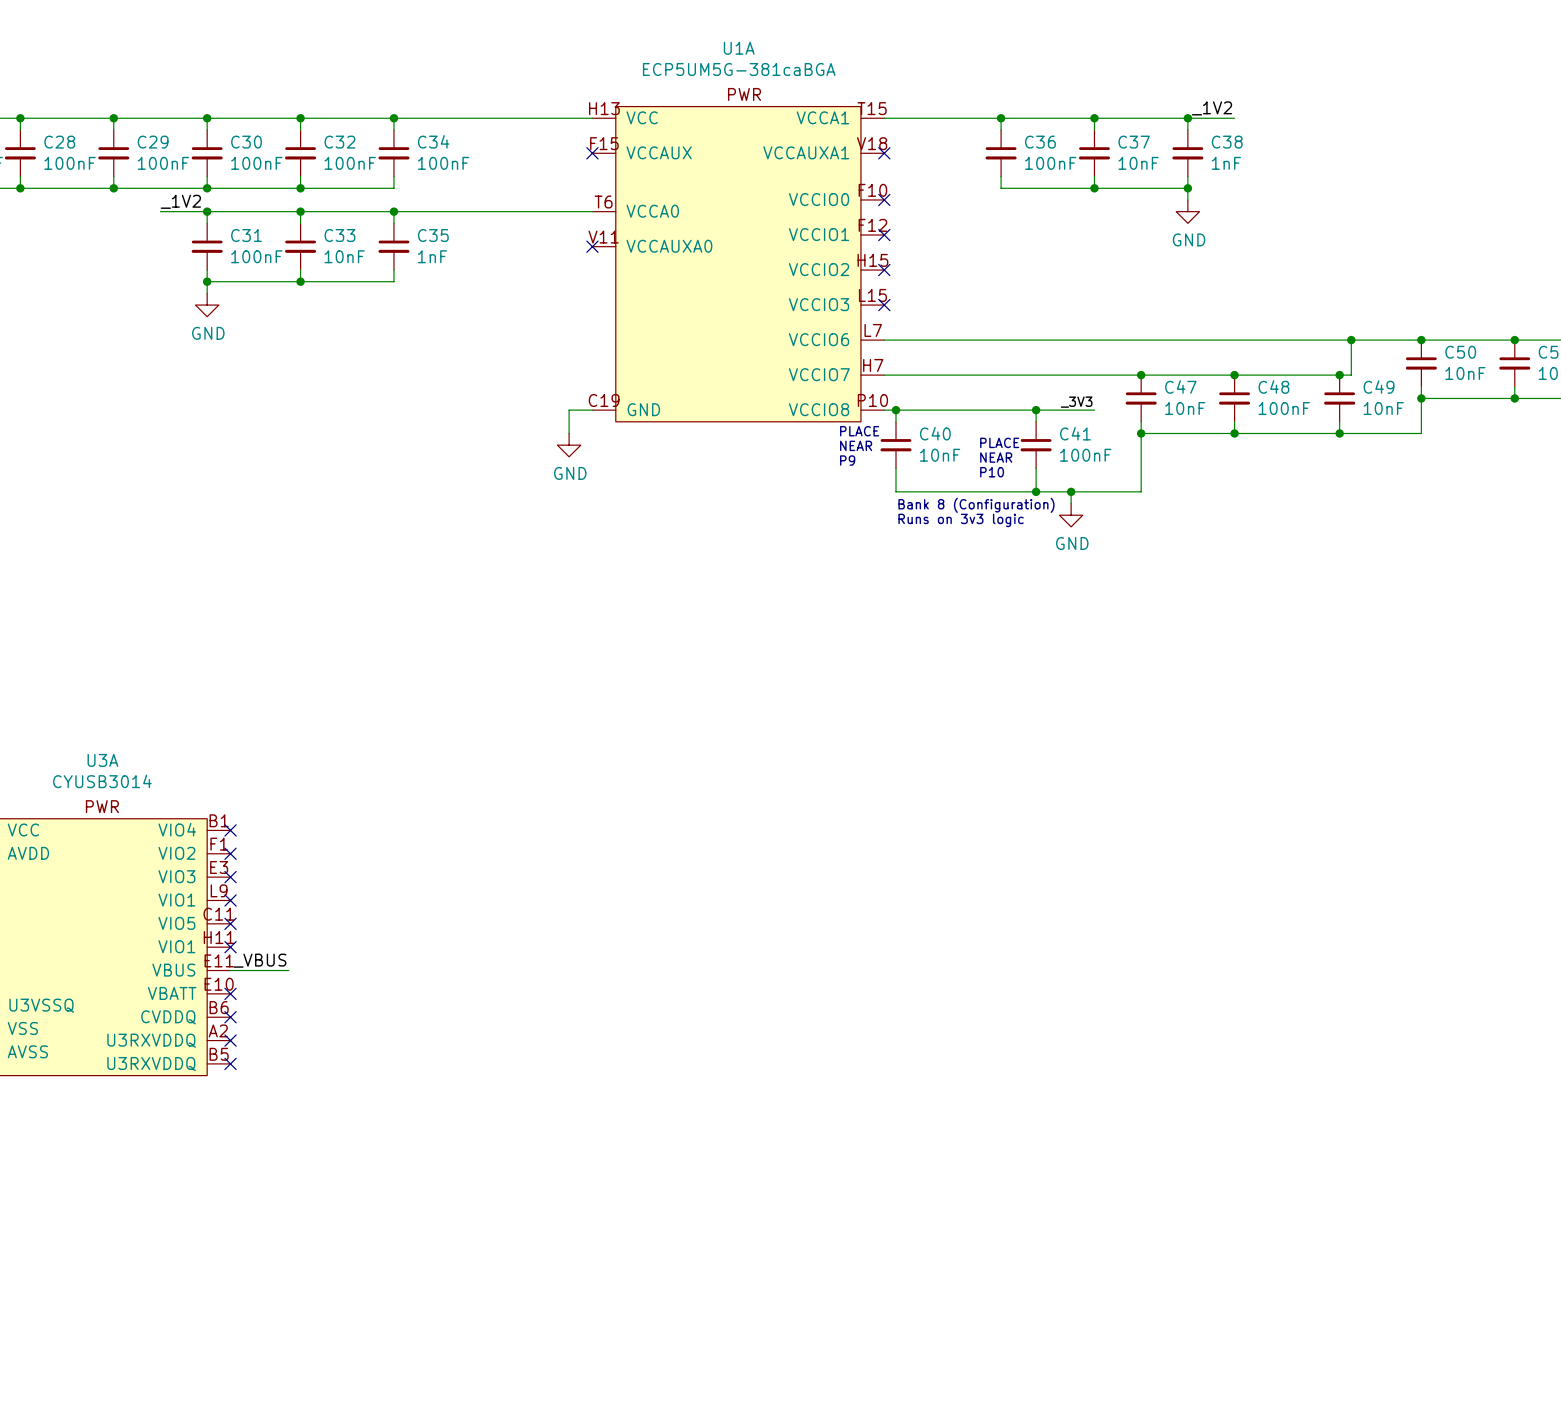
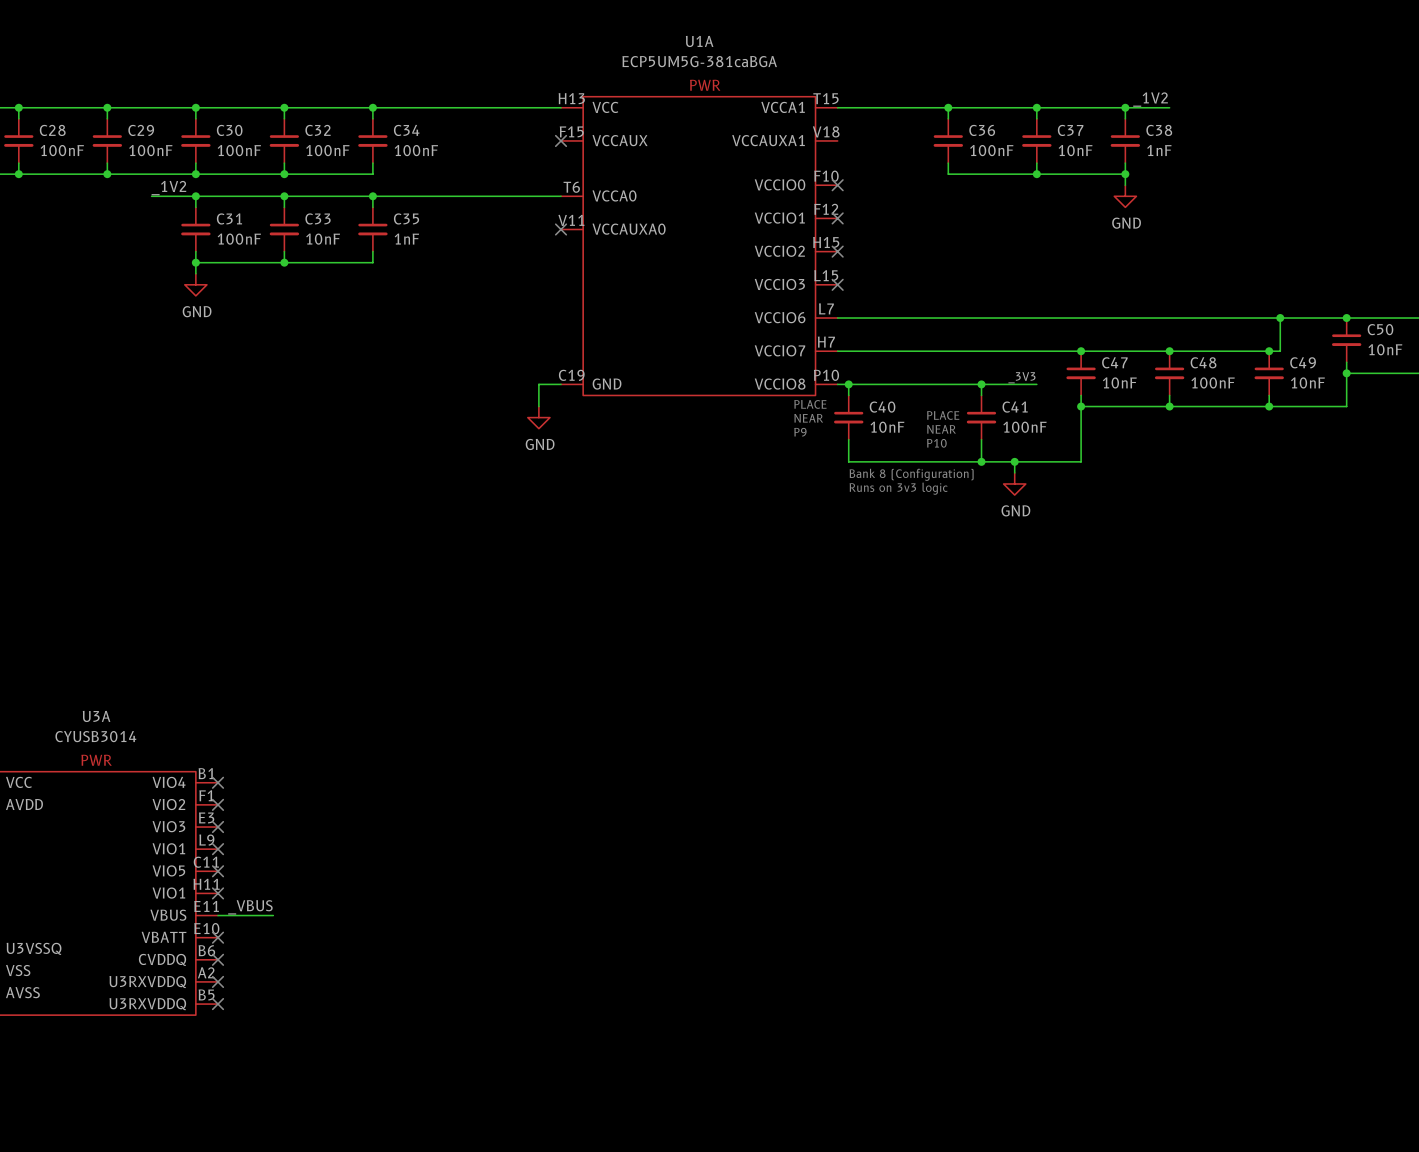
no-connect mark: (884, 153) -> none

